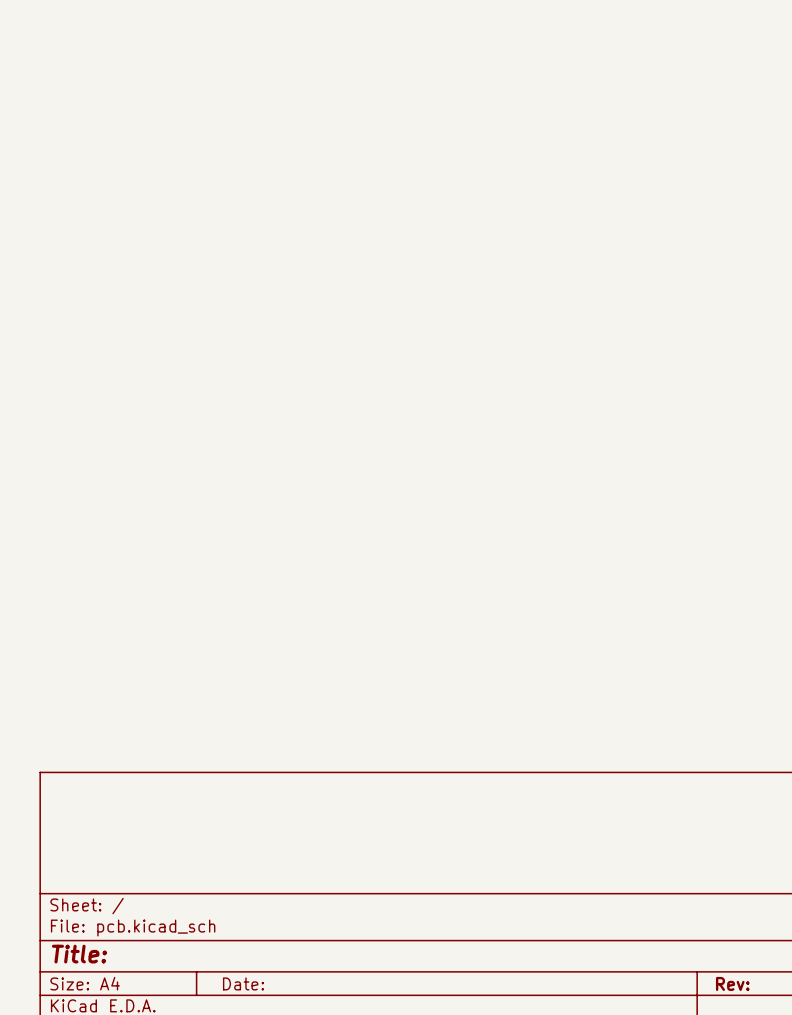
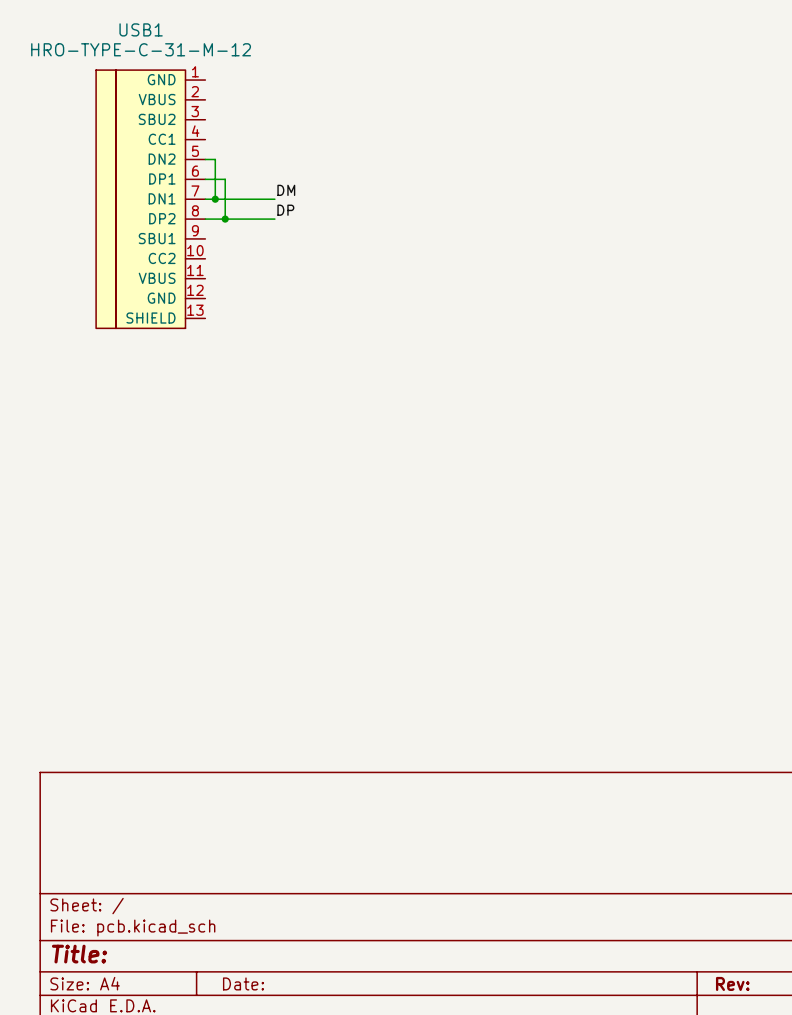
wire: none -> (205, 159) (215, 159) (215, 199)
wire: none -> (205, 179) (225, 179) (225, 219)
label: none -> DM (286, 190)
USB1: none -> HRO-TYPE-C-31-M-12 (150, 199)
wire: none -> (205, 199) (274, 199)
junction: none -> (215, 199)
label: none -> DP (285, 210)
wire: none -> (205, 219) (274, 219)
junction: none -> (225, 219)

